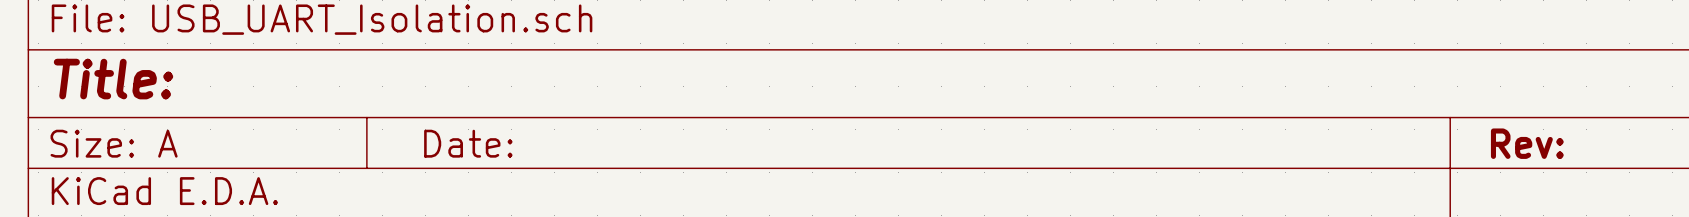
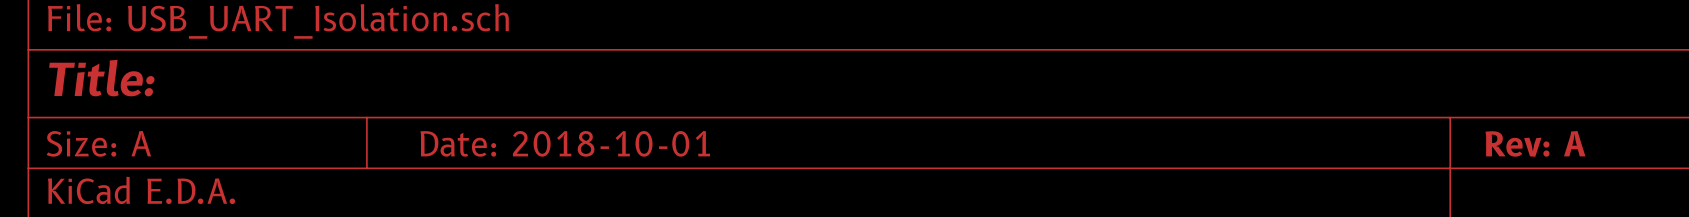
title block: Date: (468, 143) -> Date: 2018-10-01 (565, 143)
title block: Rev: (1527, 143) -> Rev: A (1535, 143)

